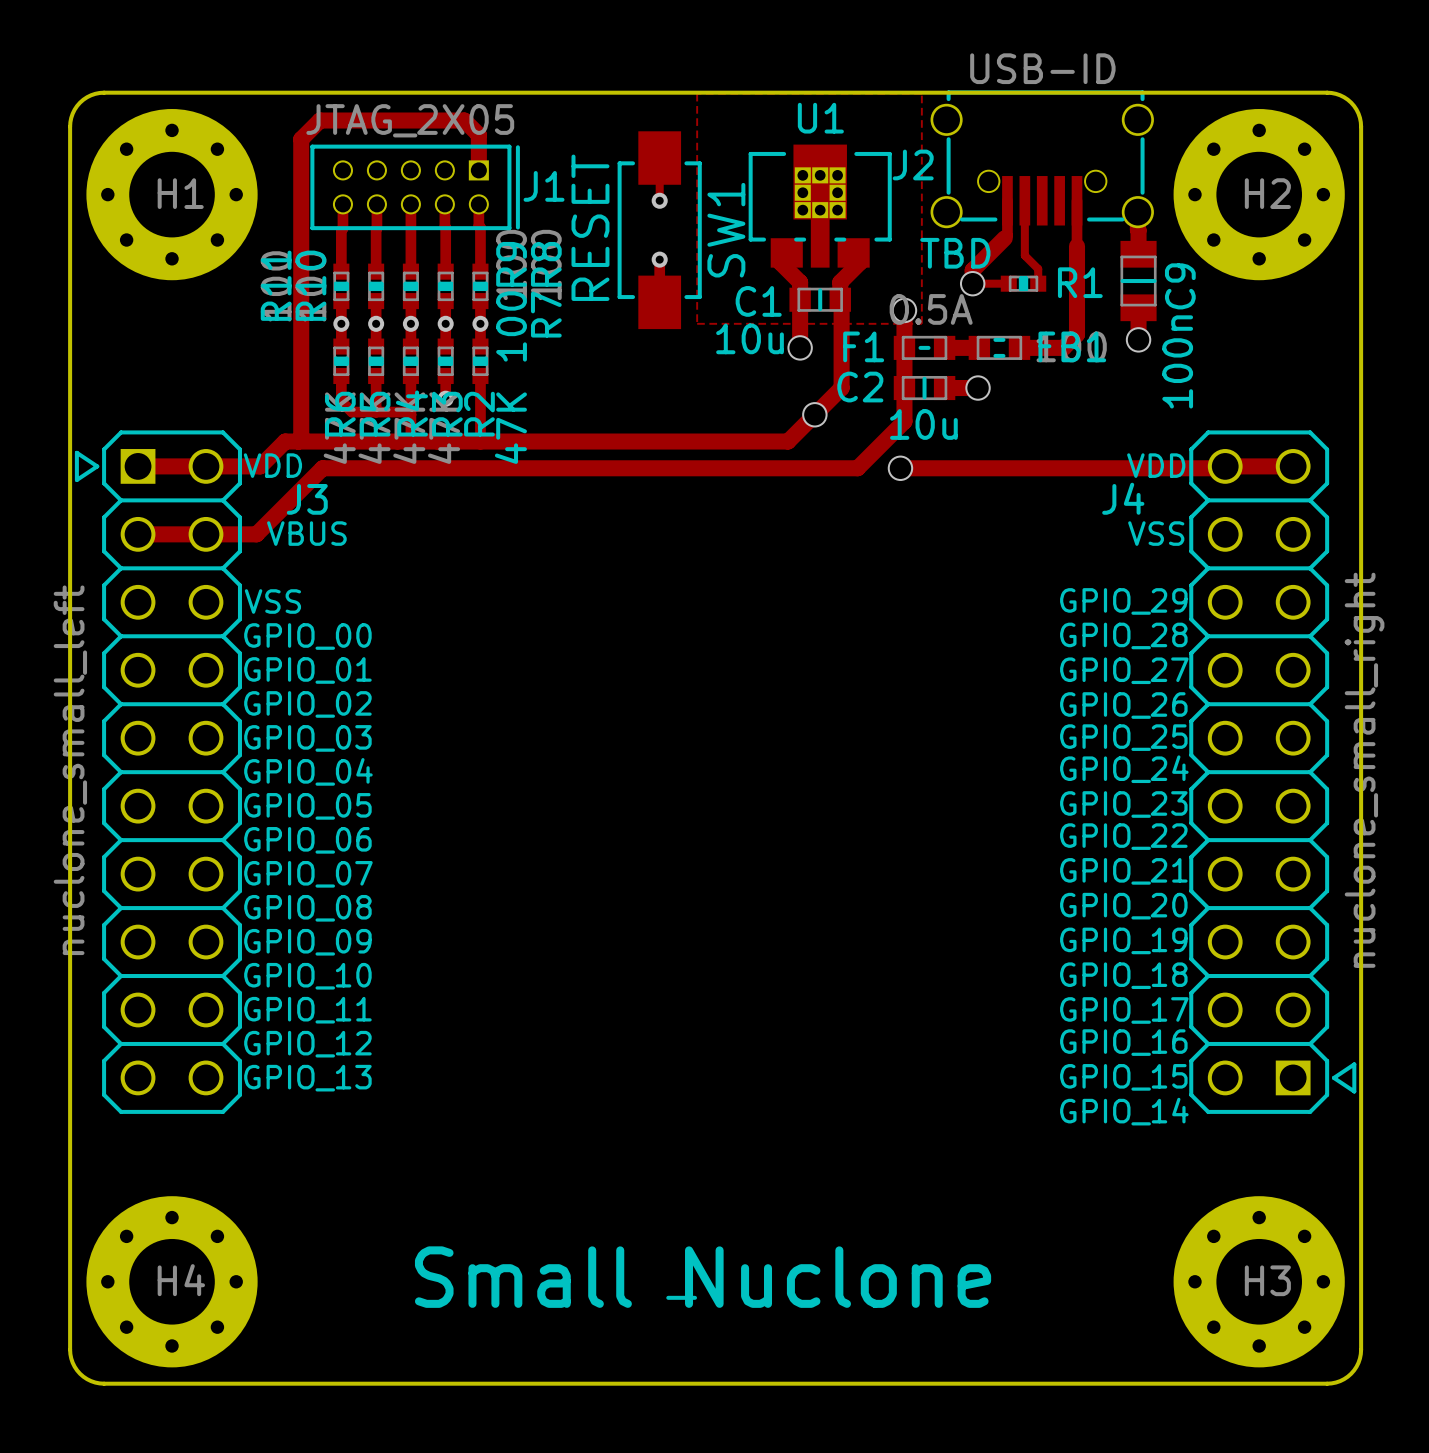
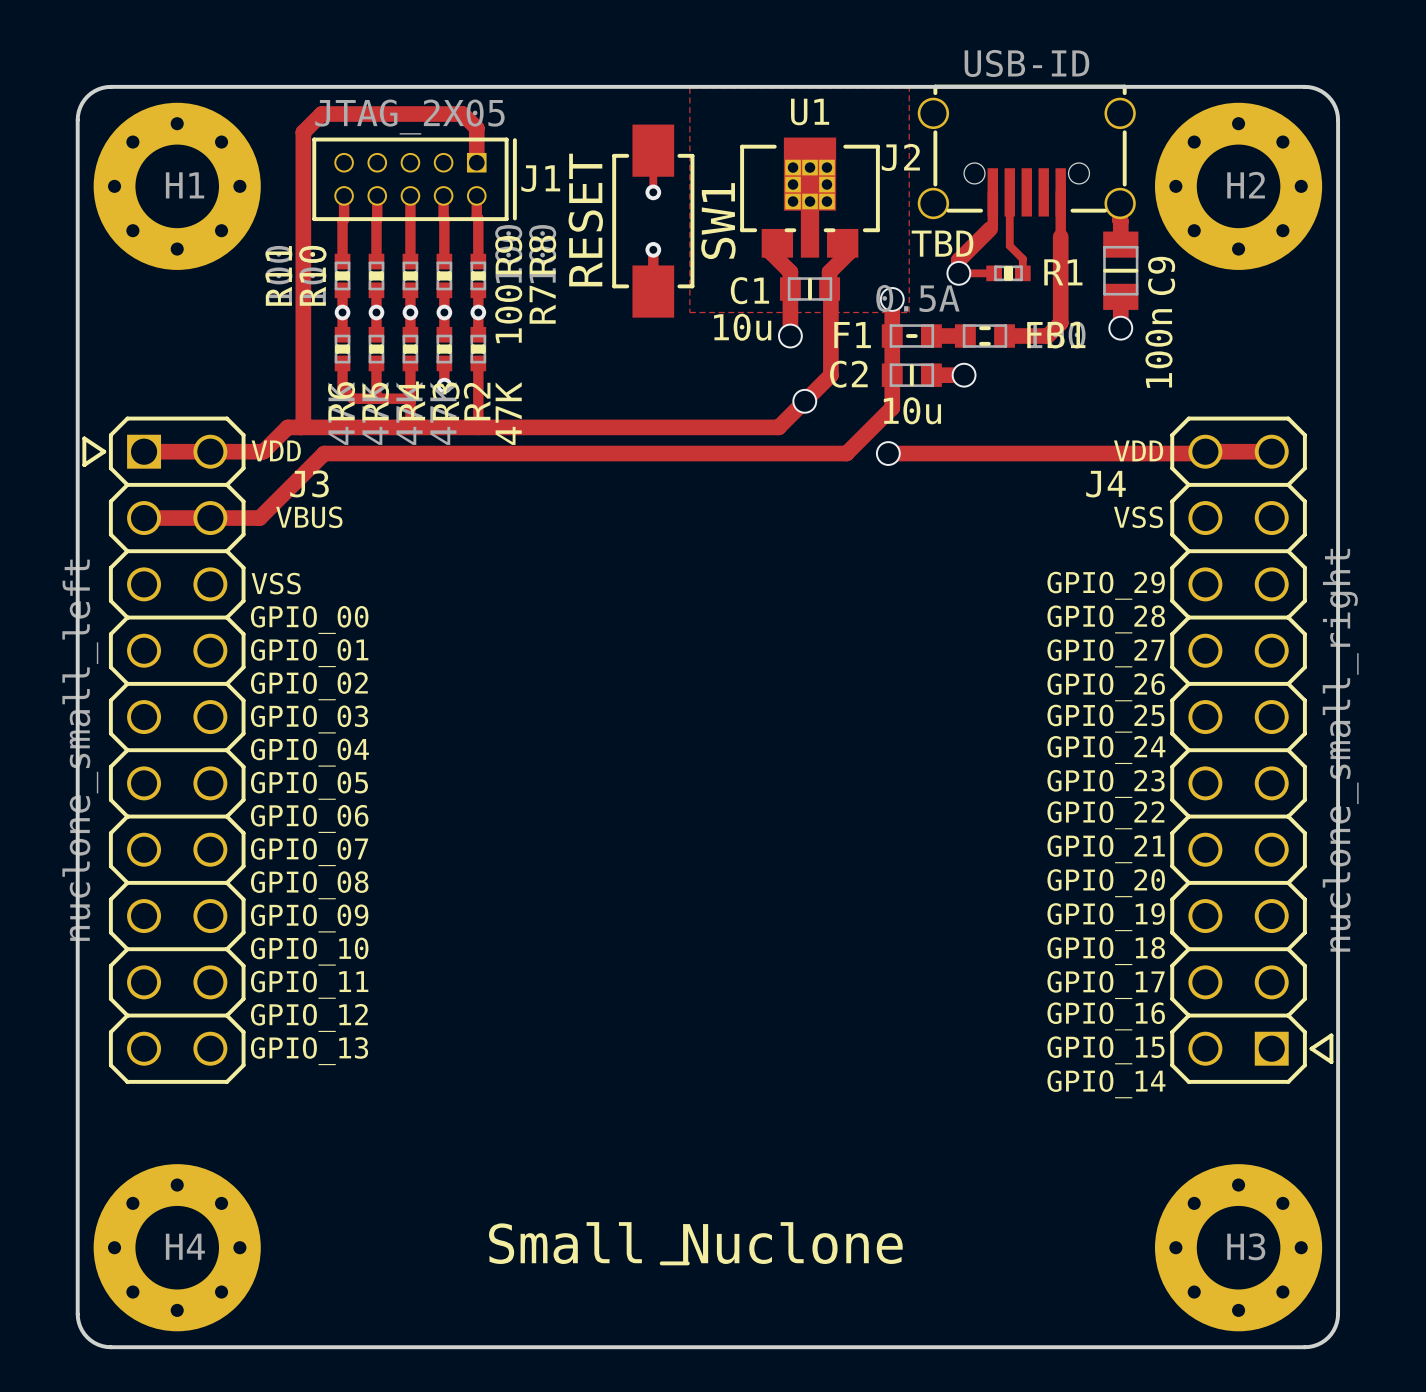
drawing shape: [414, 1246, 992, 1308] -> [488, 1222, 903, 1266]

